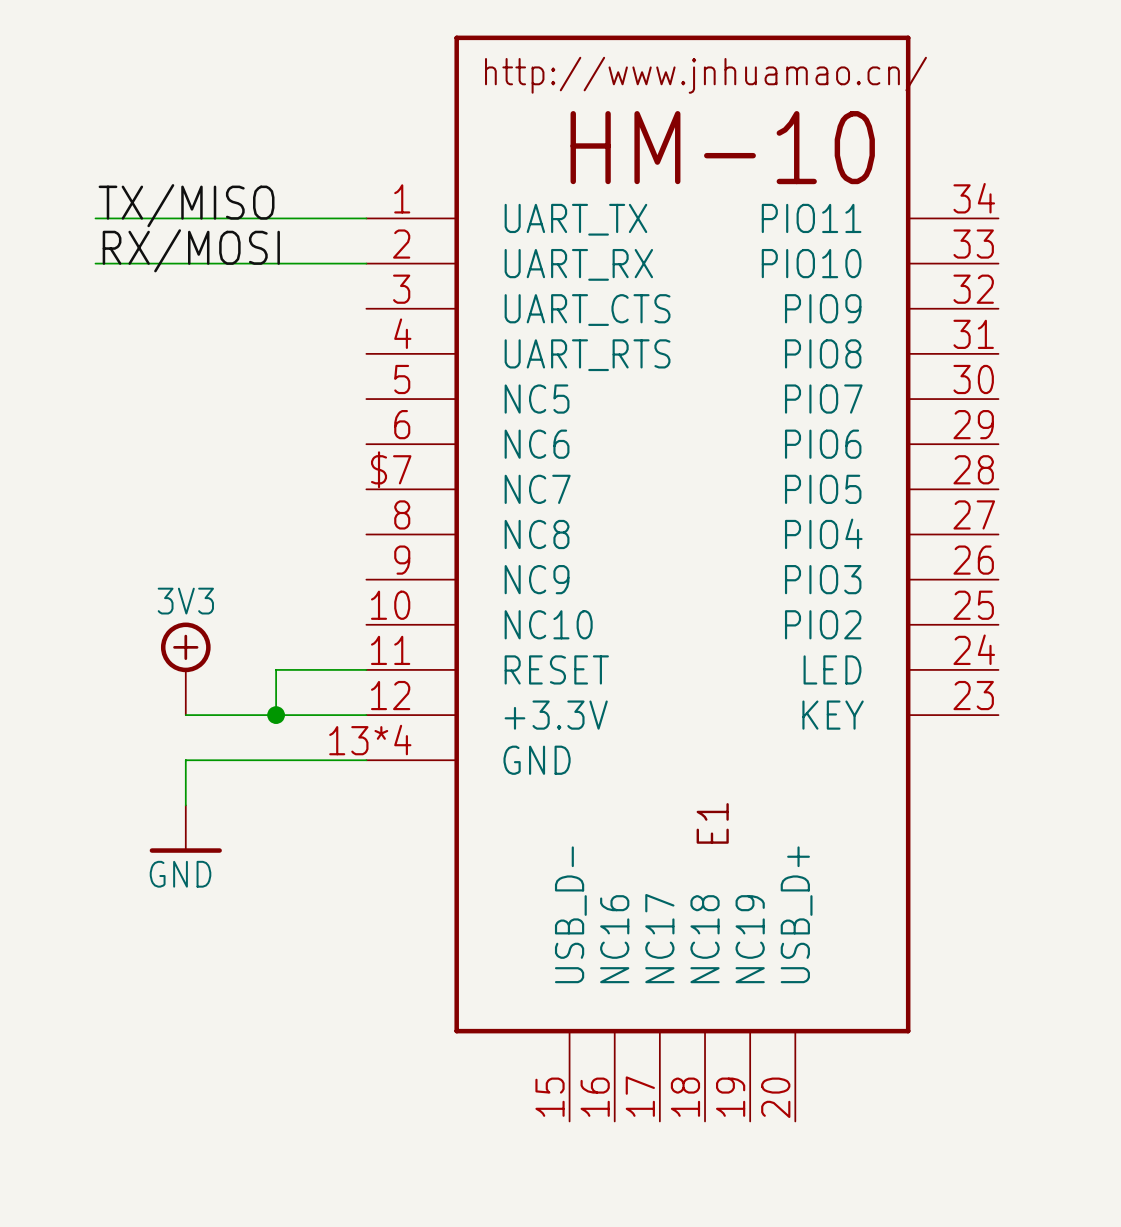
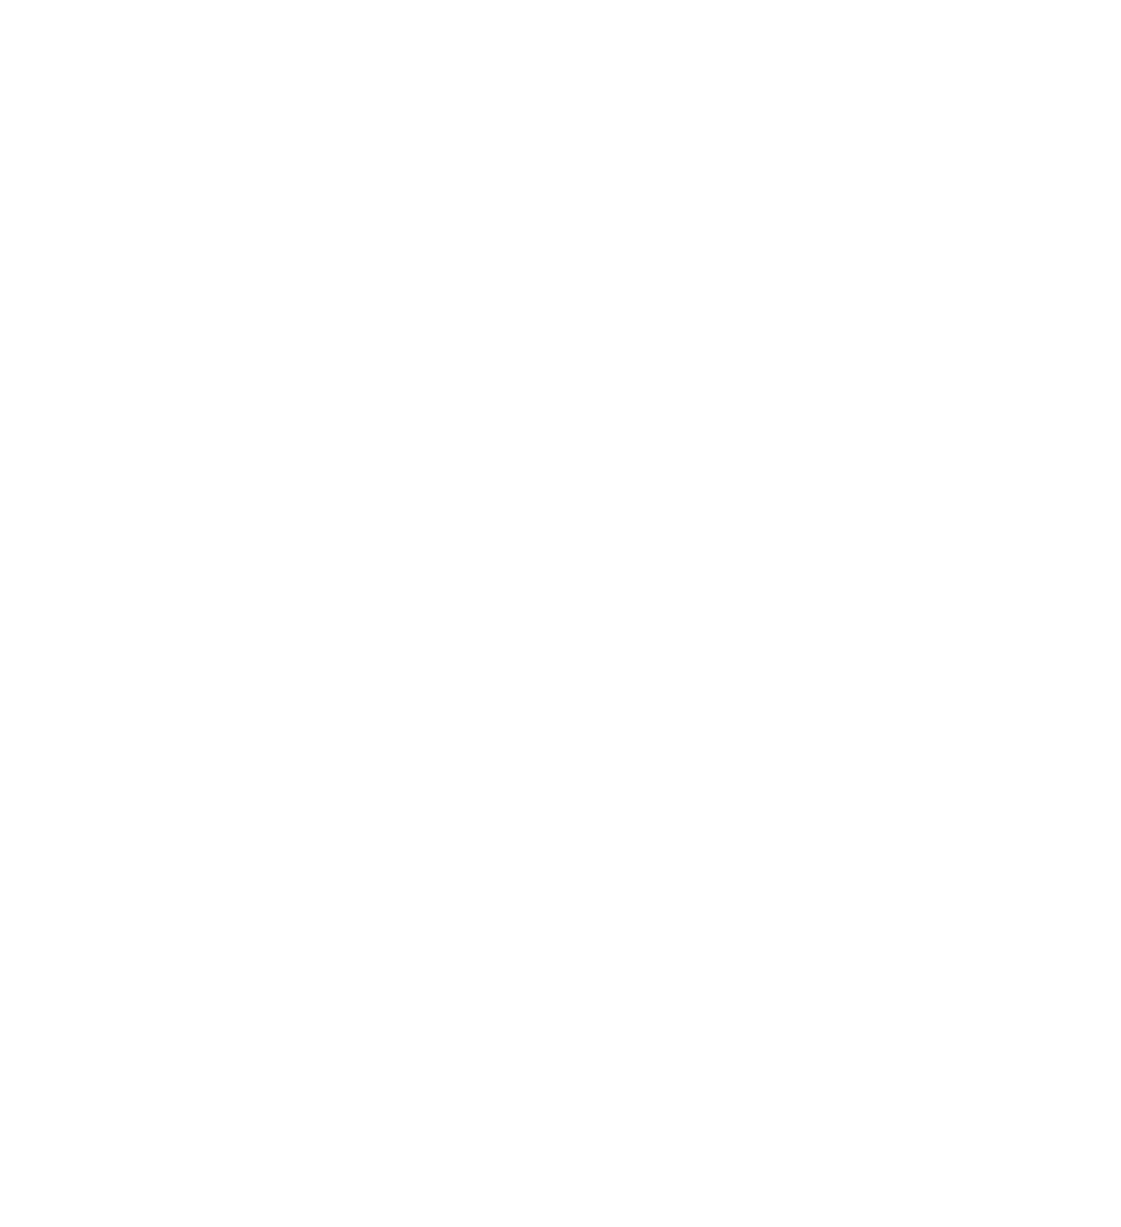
label: TX/MISO (186, 205) -> none
wire: (95, 218) (366, 218) -> none
label: RX/MOSI (191, 250) -> none
wire: (95, 263) (366, 263) -> none
E1: (682, 578) -> none
power symbol: 3V3 (185, 668) -> none
wire: (366, 669) (276, 669) (276, 715) -> none
wire: (185, 715) (366, 715) -> none
junction: (276, 715) -> none
wire: (366, 760) (185, 760) (185, 805) -> none
power symbol: GND (185, 829) -> none

